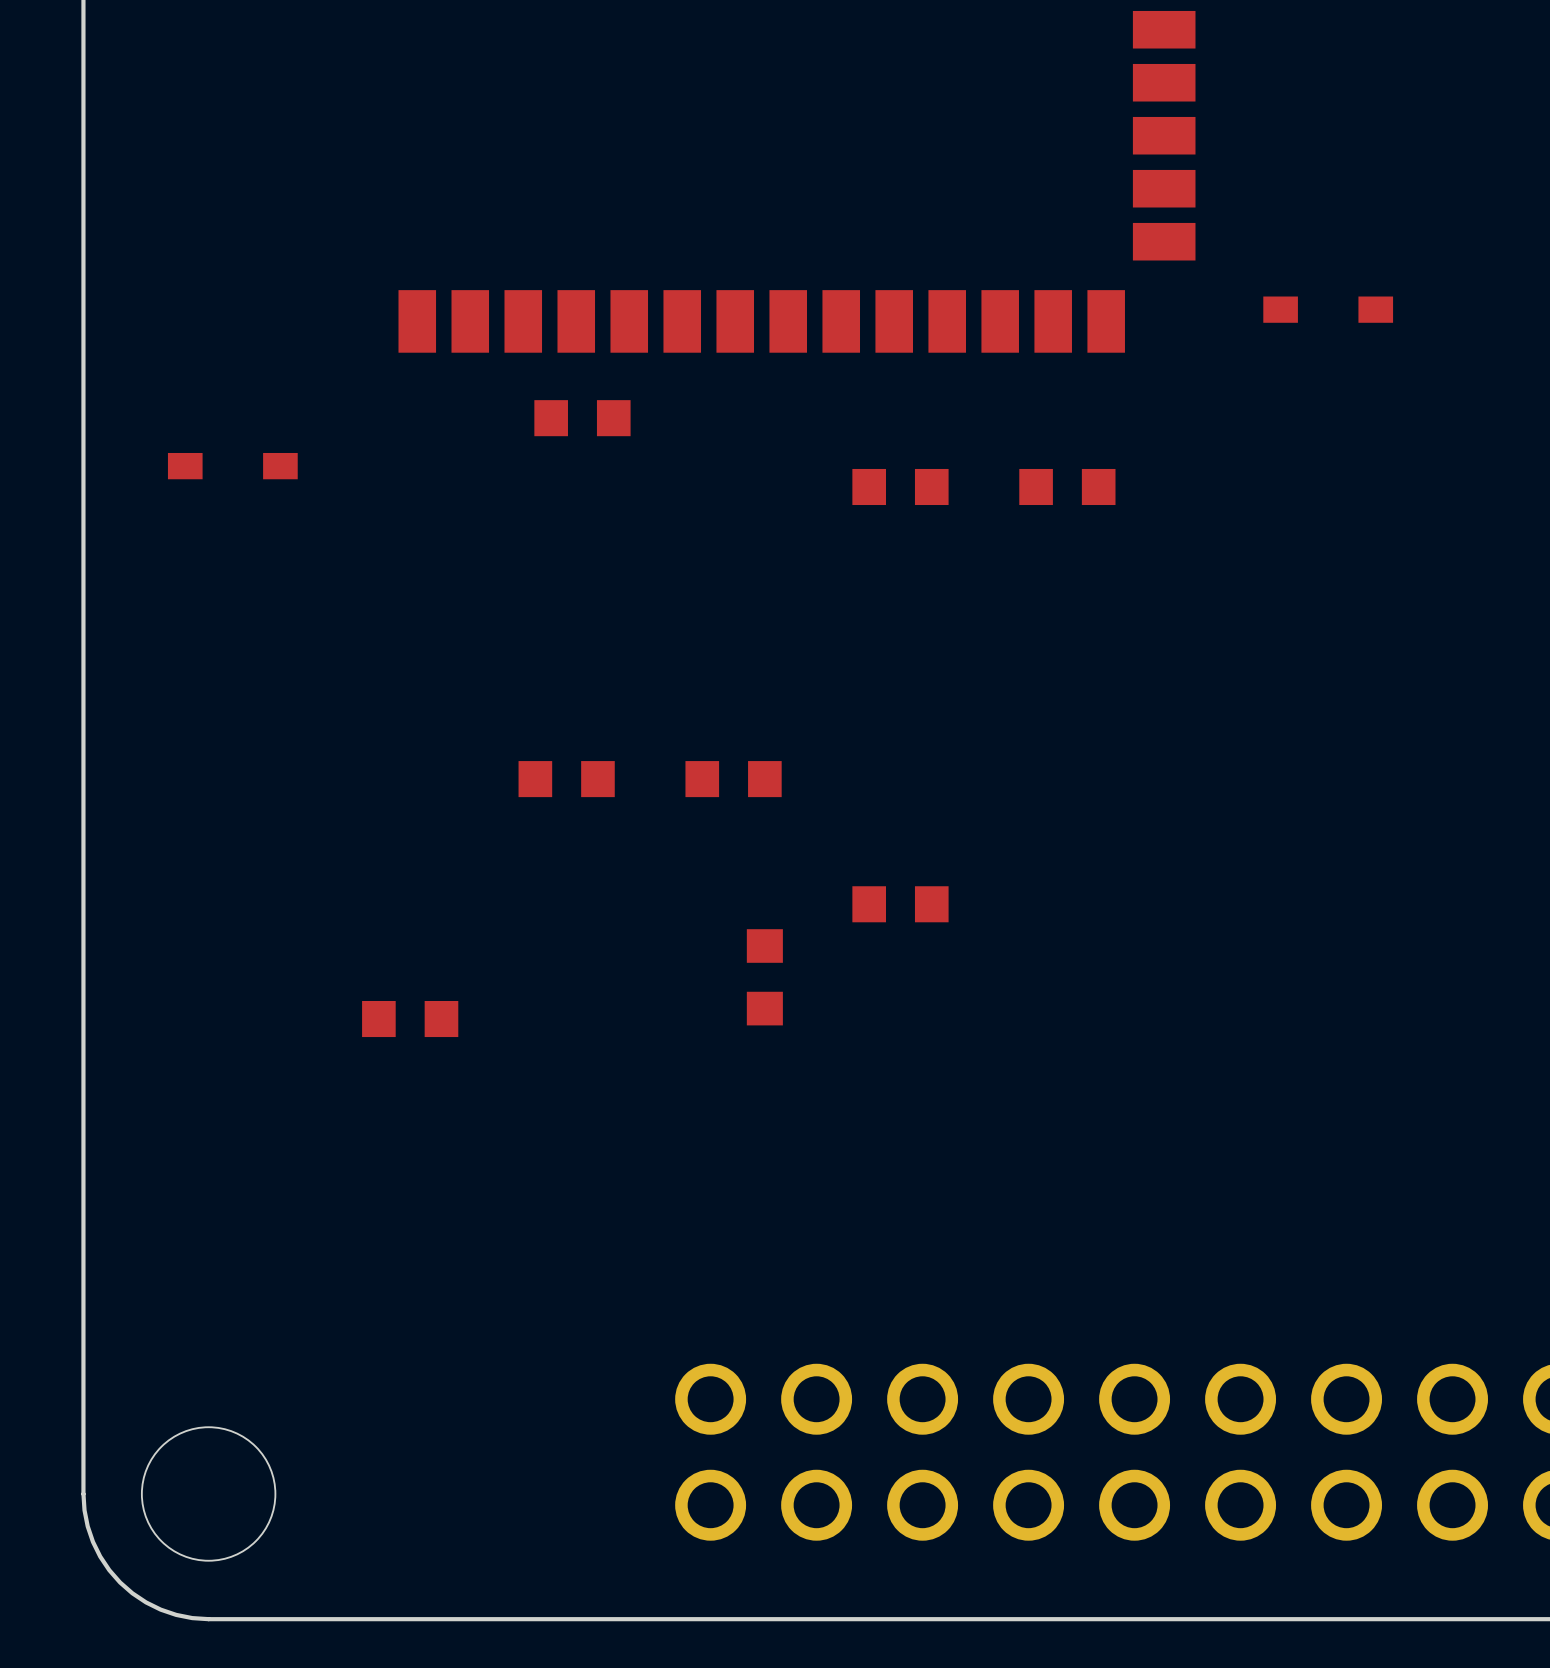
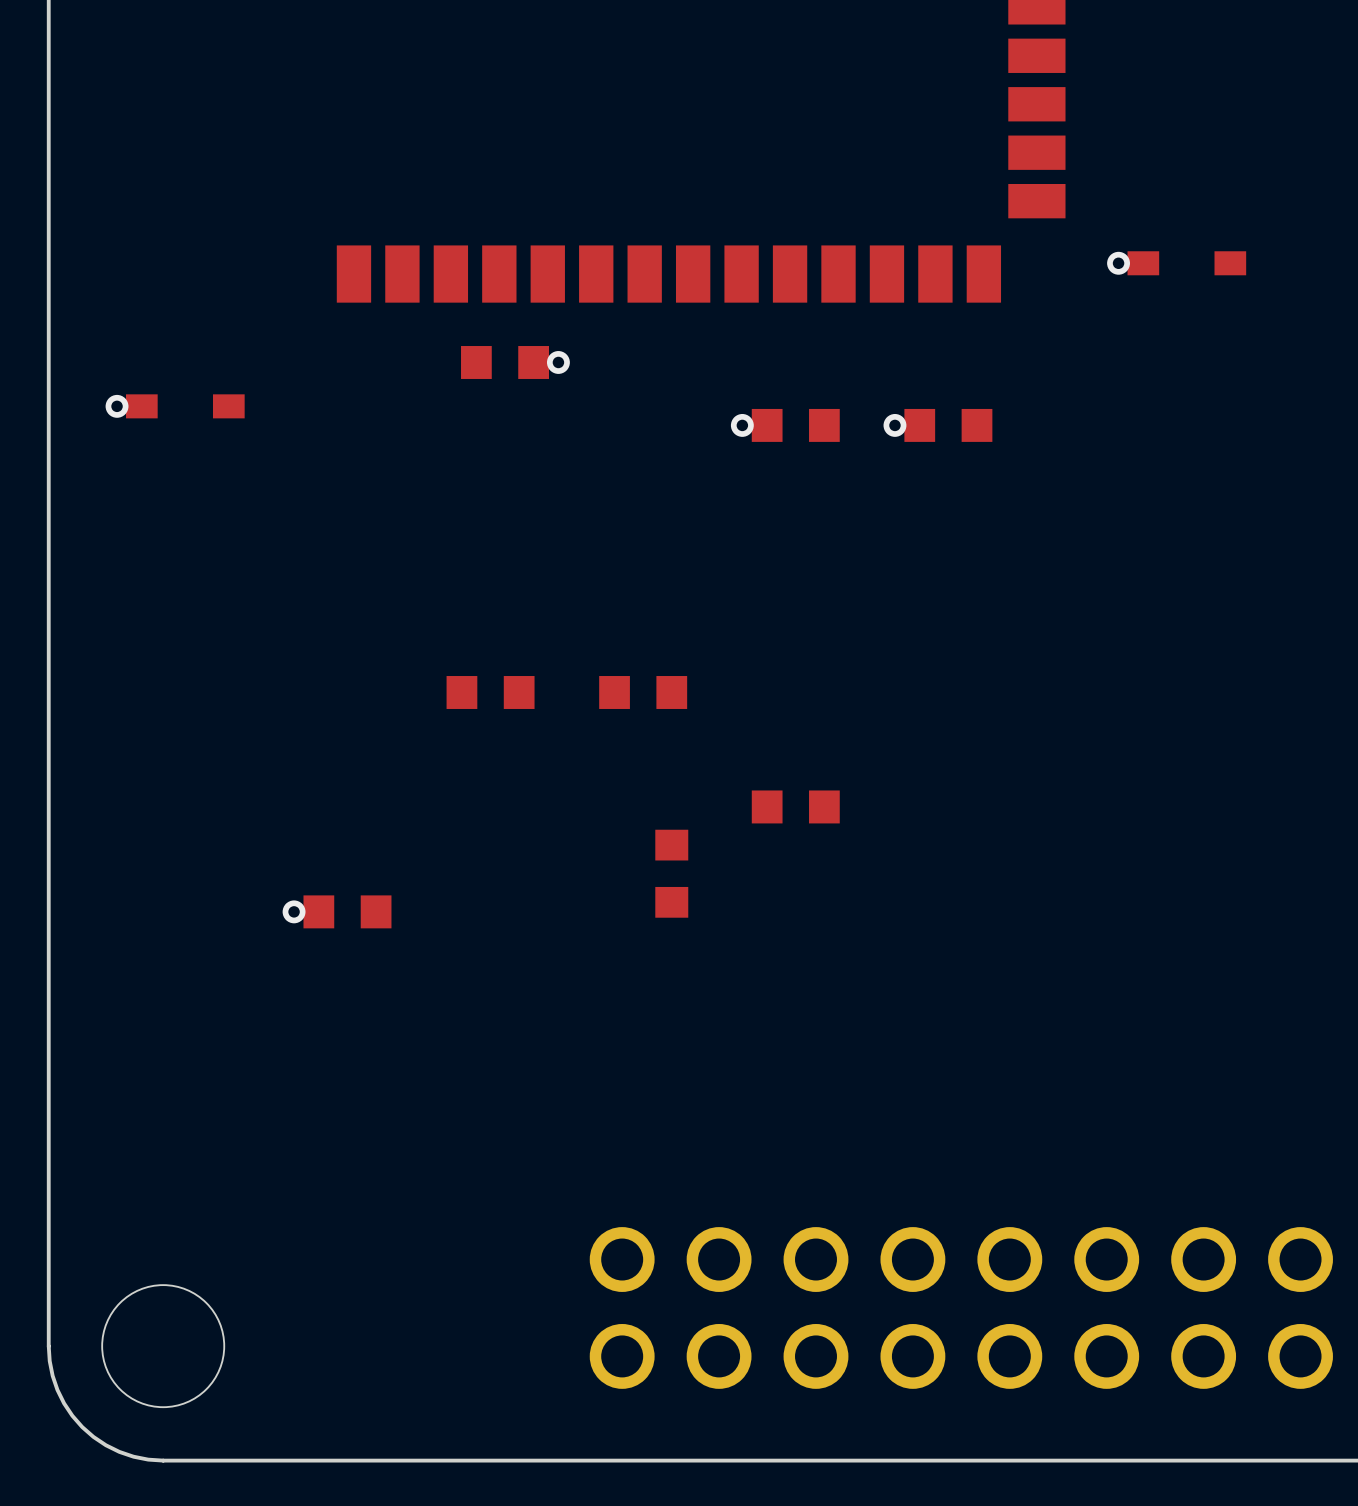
via: none -> (1118, 263)
via: none -> (558, 362)
via: none -> (117, 406)
via: none -> (742, 425)
via: none -> (894, 425)
via: none -> (294, 911)

